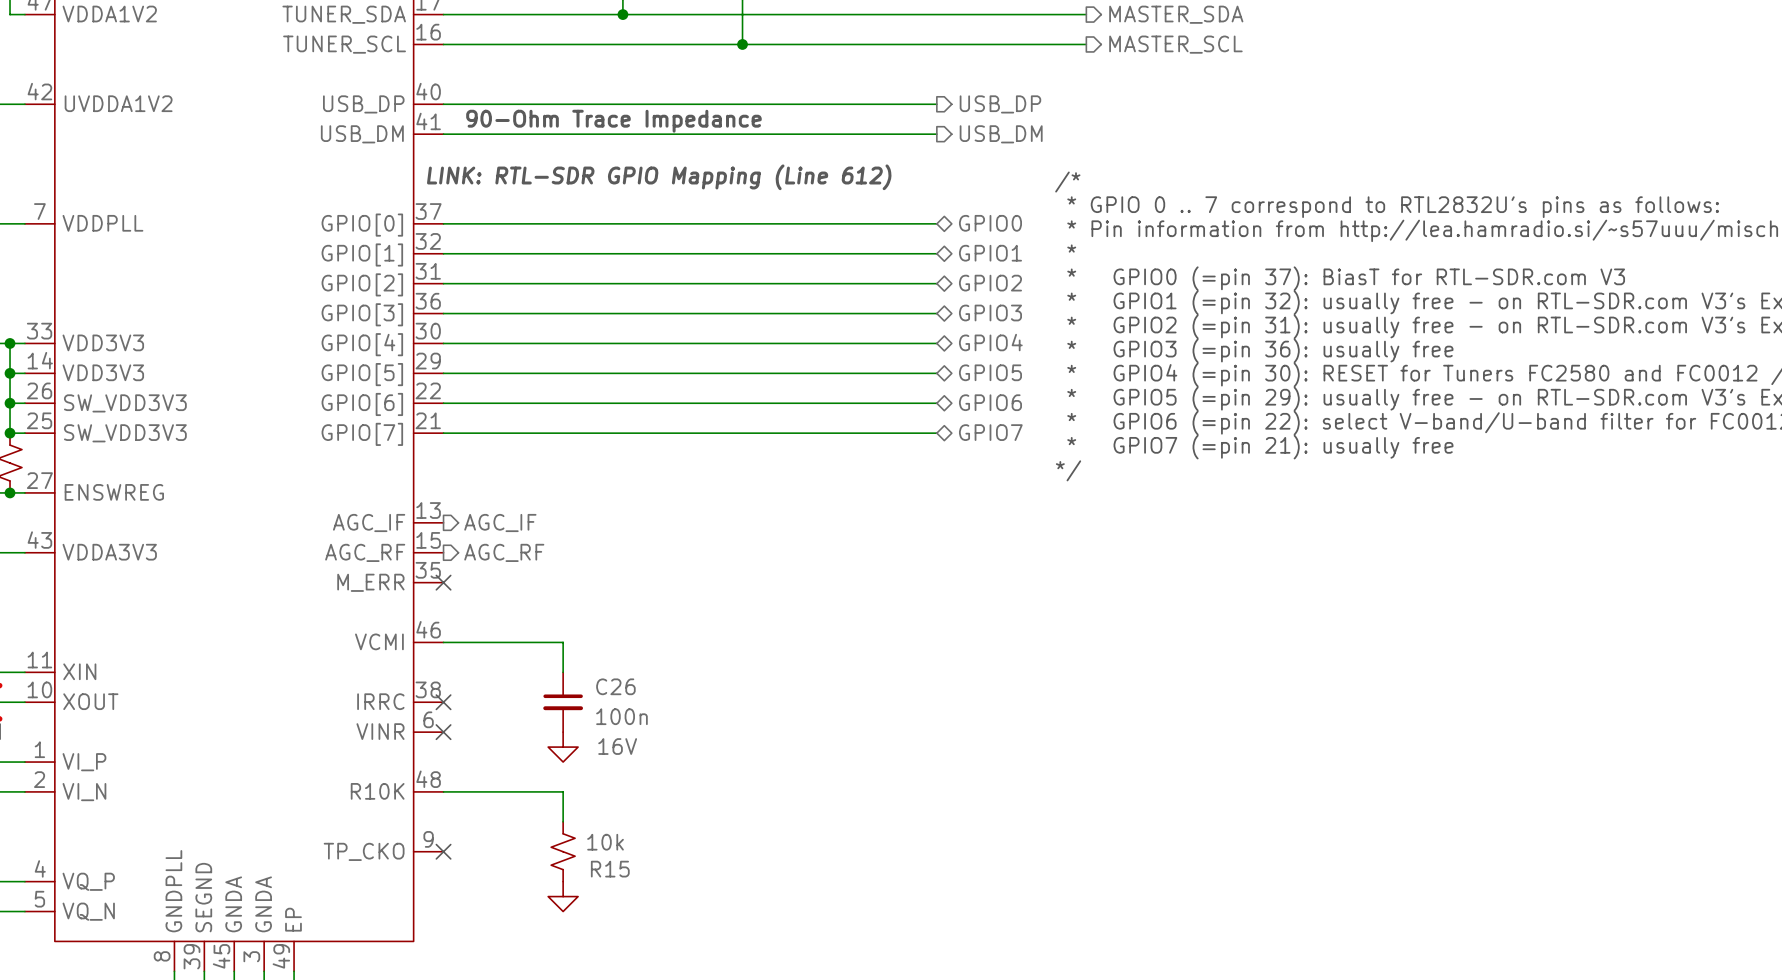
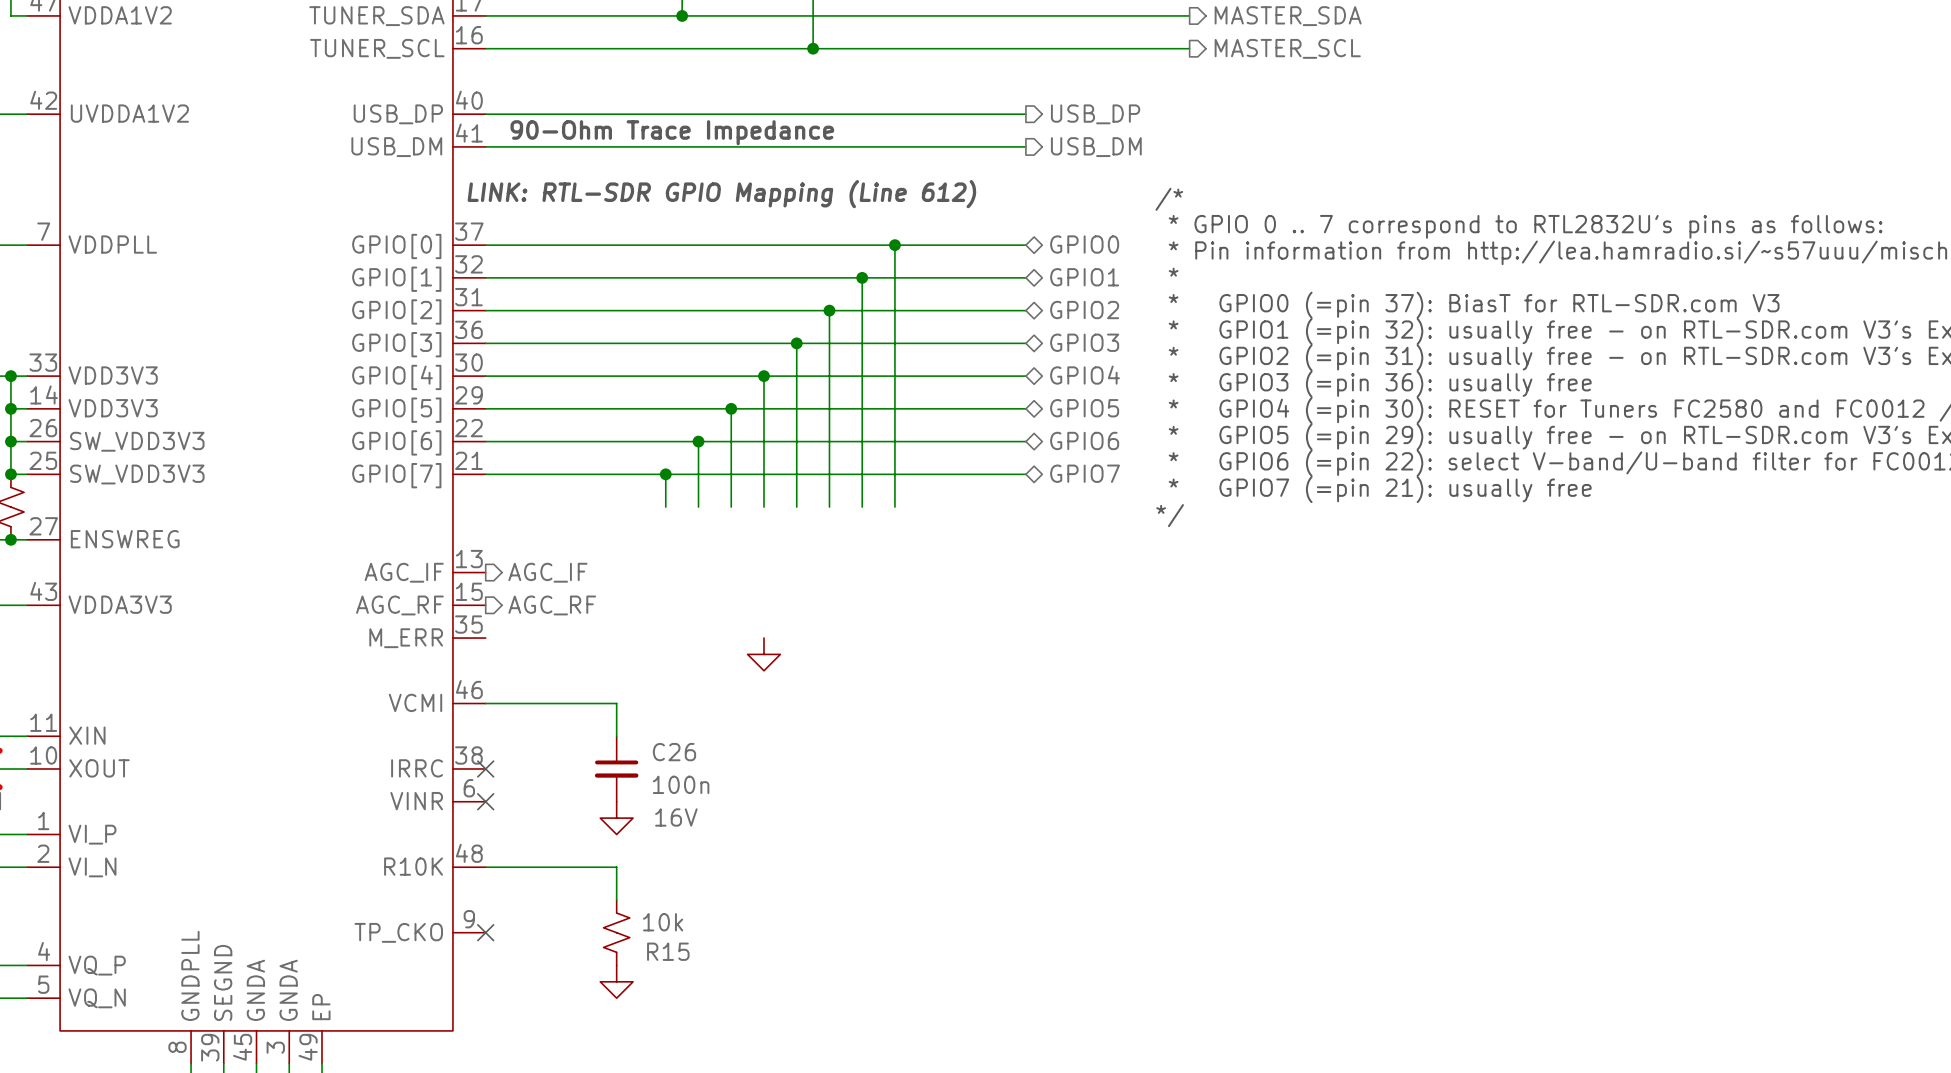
wire: none -> (894, 245) (894, 507)
junction: none -> (894, 245)
wire: none -> (862, 277) (862, 507)
junction: none -> (862, 277)
wire: none -> (829, 310) (829, 507)
junction: none -> (829, 310)
wire: none -> (796, 343) (796, 507)
junction: none -> (796, 343)
wire: none -> (763, 376) (763, 507)
junction: none -> (763, 376)
wire: none -> (731, 408) (731, 507)
junction: none -> (731, 408)
wire: none -> (698, 441) (698, 507)
junction: none -> (698, 441)
wire: none -> (665, 474) (665, 507)
junction: none -> (665, 474)
no-connect mark: (443, 582) -> none
power symbol: none -> (763, 654)

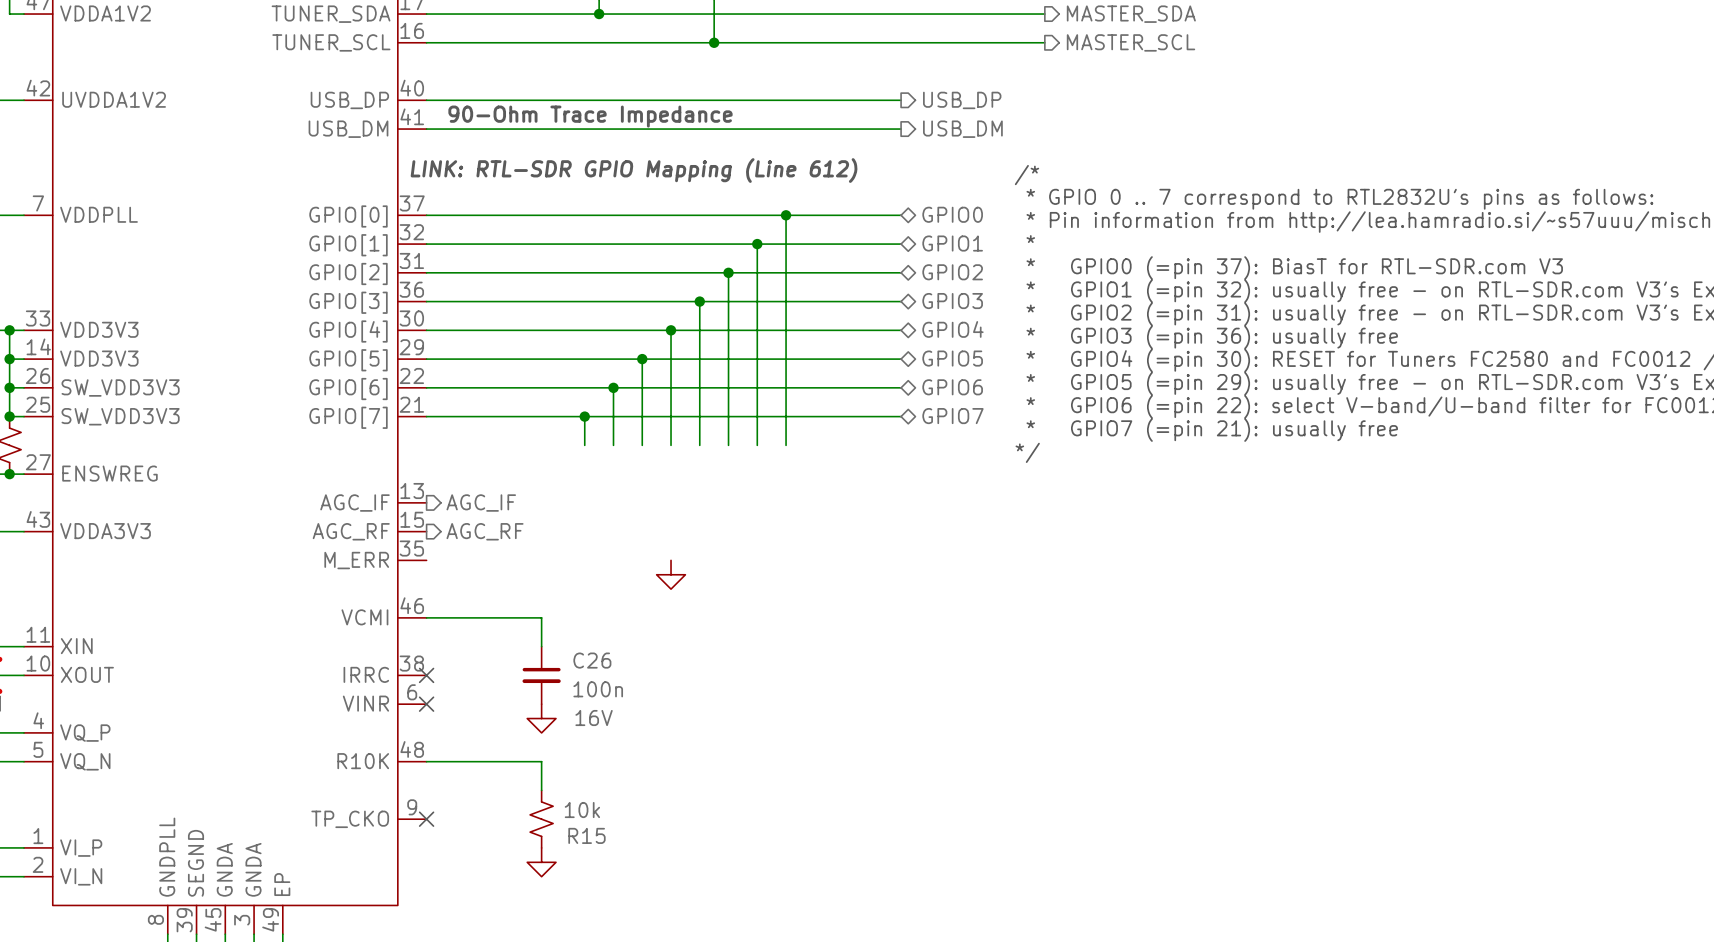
part pin number: 1 (43, 820) -> 4 (38, 720)
part pin name: VI_P (92, 834) -> VQ_P (85, 733)
part pin number: 2 (43, 853) -> 5 (38, 749)
part pin name: VI_N (92, 867) -> VQ_N (85, 761)
part pin number: 4 (44, 951) -> 1 (38, 836)
part pin name: VQ_P (97, 965) -> VI_P (81, 848)
part pin number: 5 (43, 984) -> 2 (38, 864)
part pin name: VQ_N (97, 998) -> VI_N (81, 876)

